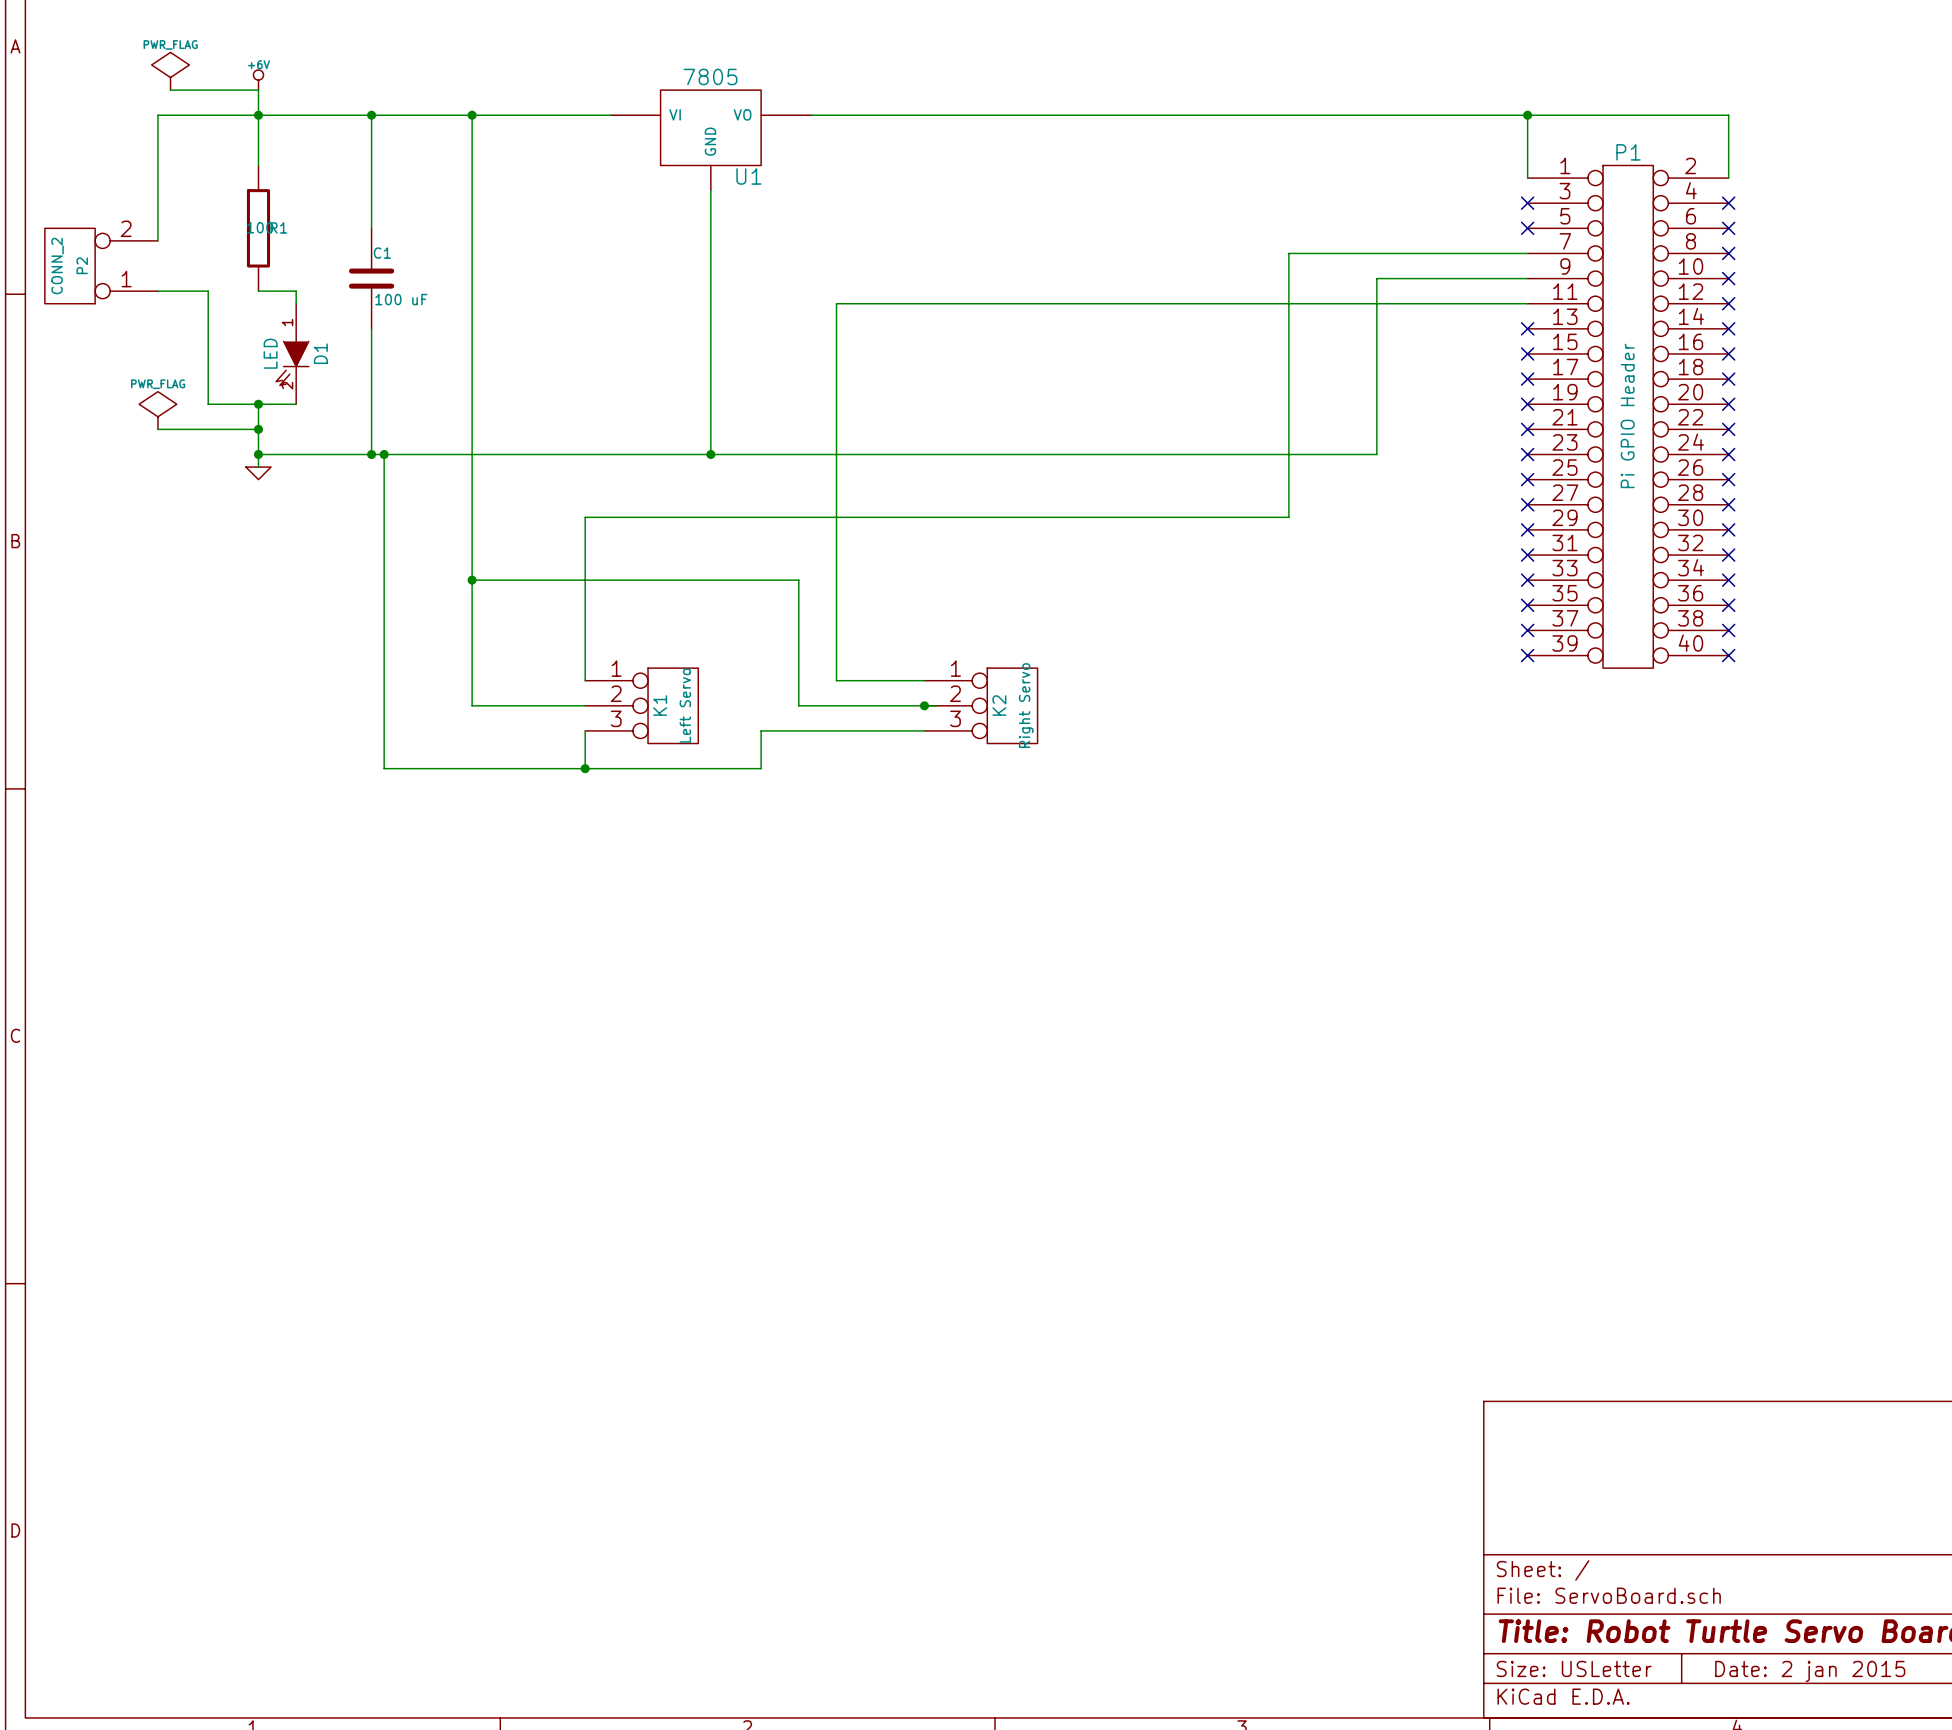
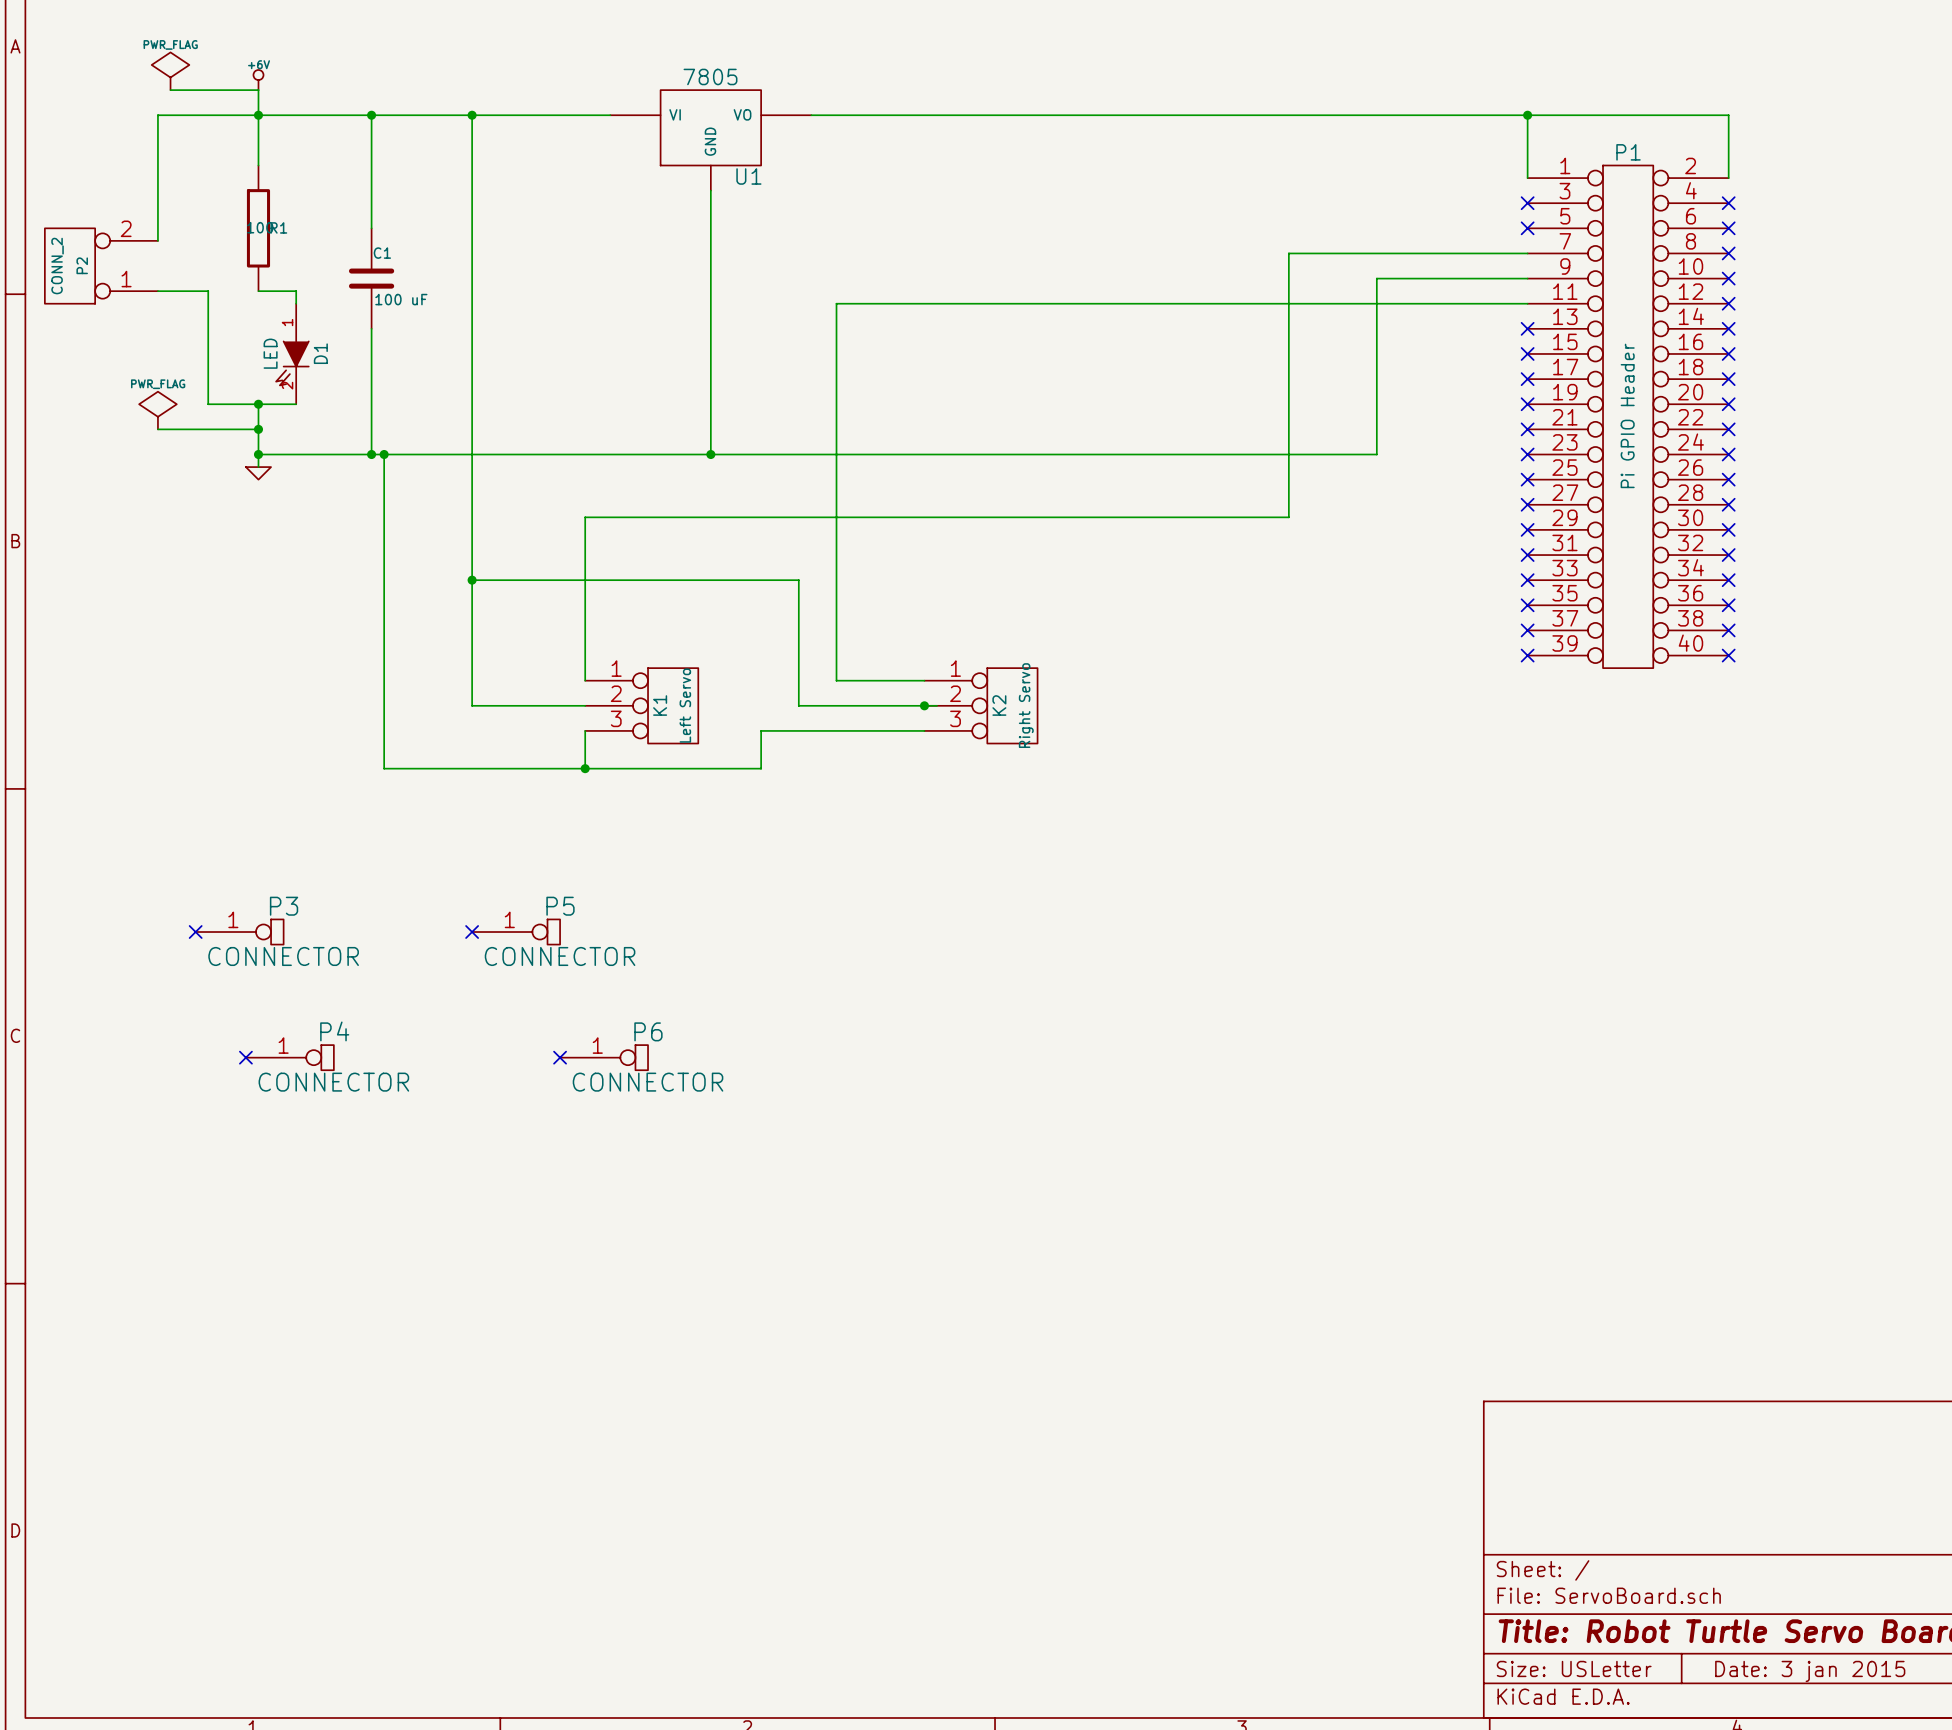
no-connect mark: none -> (195, 932)
P3: none -> CONNECTOR (239, 932)
no-connect mark: none -> (472, 932)
P5: none -> CONNECTOR (516, 932)
no-connect mark: none -> (245, 1057)
P4: none -> CONNECTOR (289, 1057)
no-connect mark: none -> (560, 1057)
P6: none -> CONNECTOR (604, 1057)
title block: Date: 2 jan 2015 (1810, 1671) -> Date: 3 jan 2015 (1810, 1671)

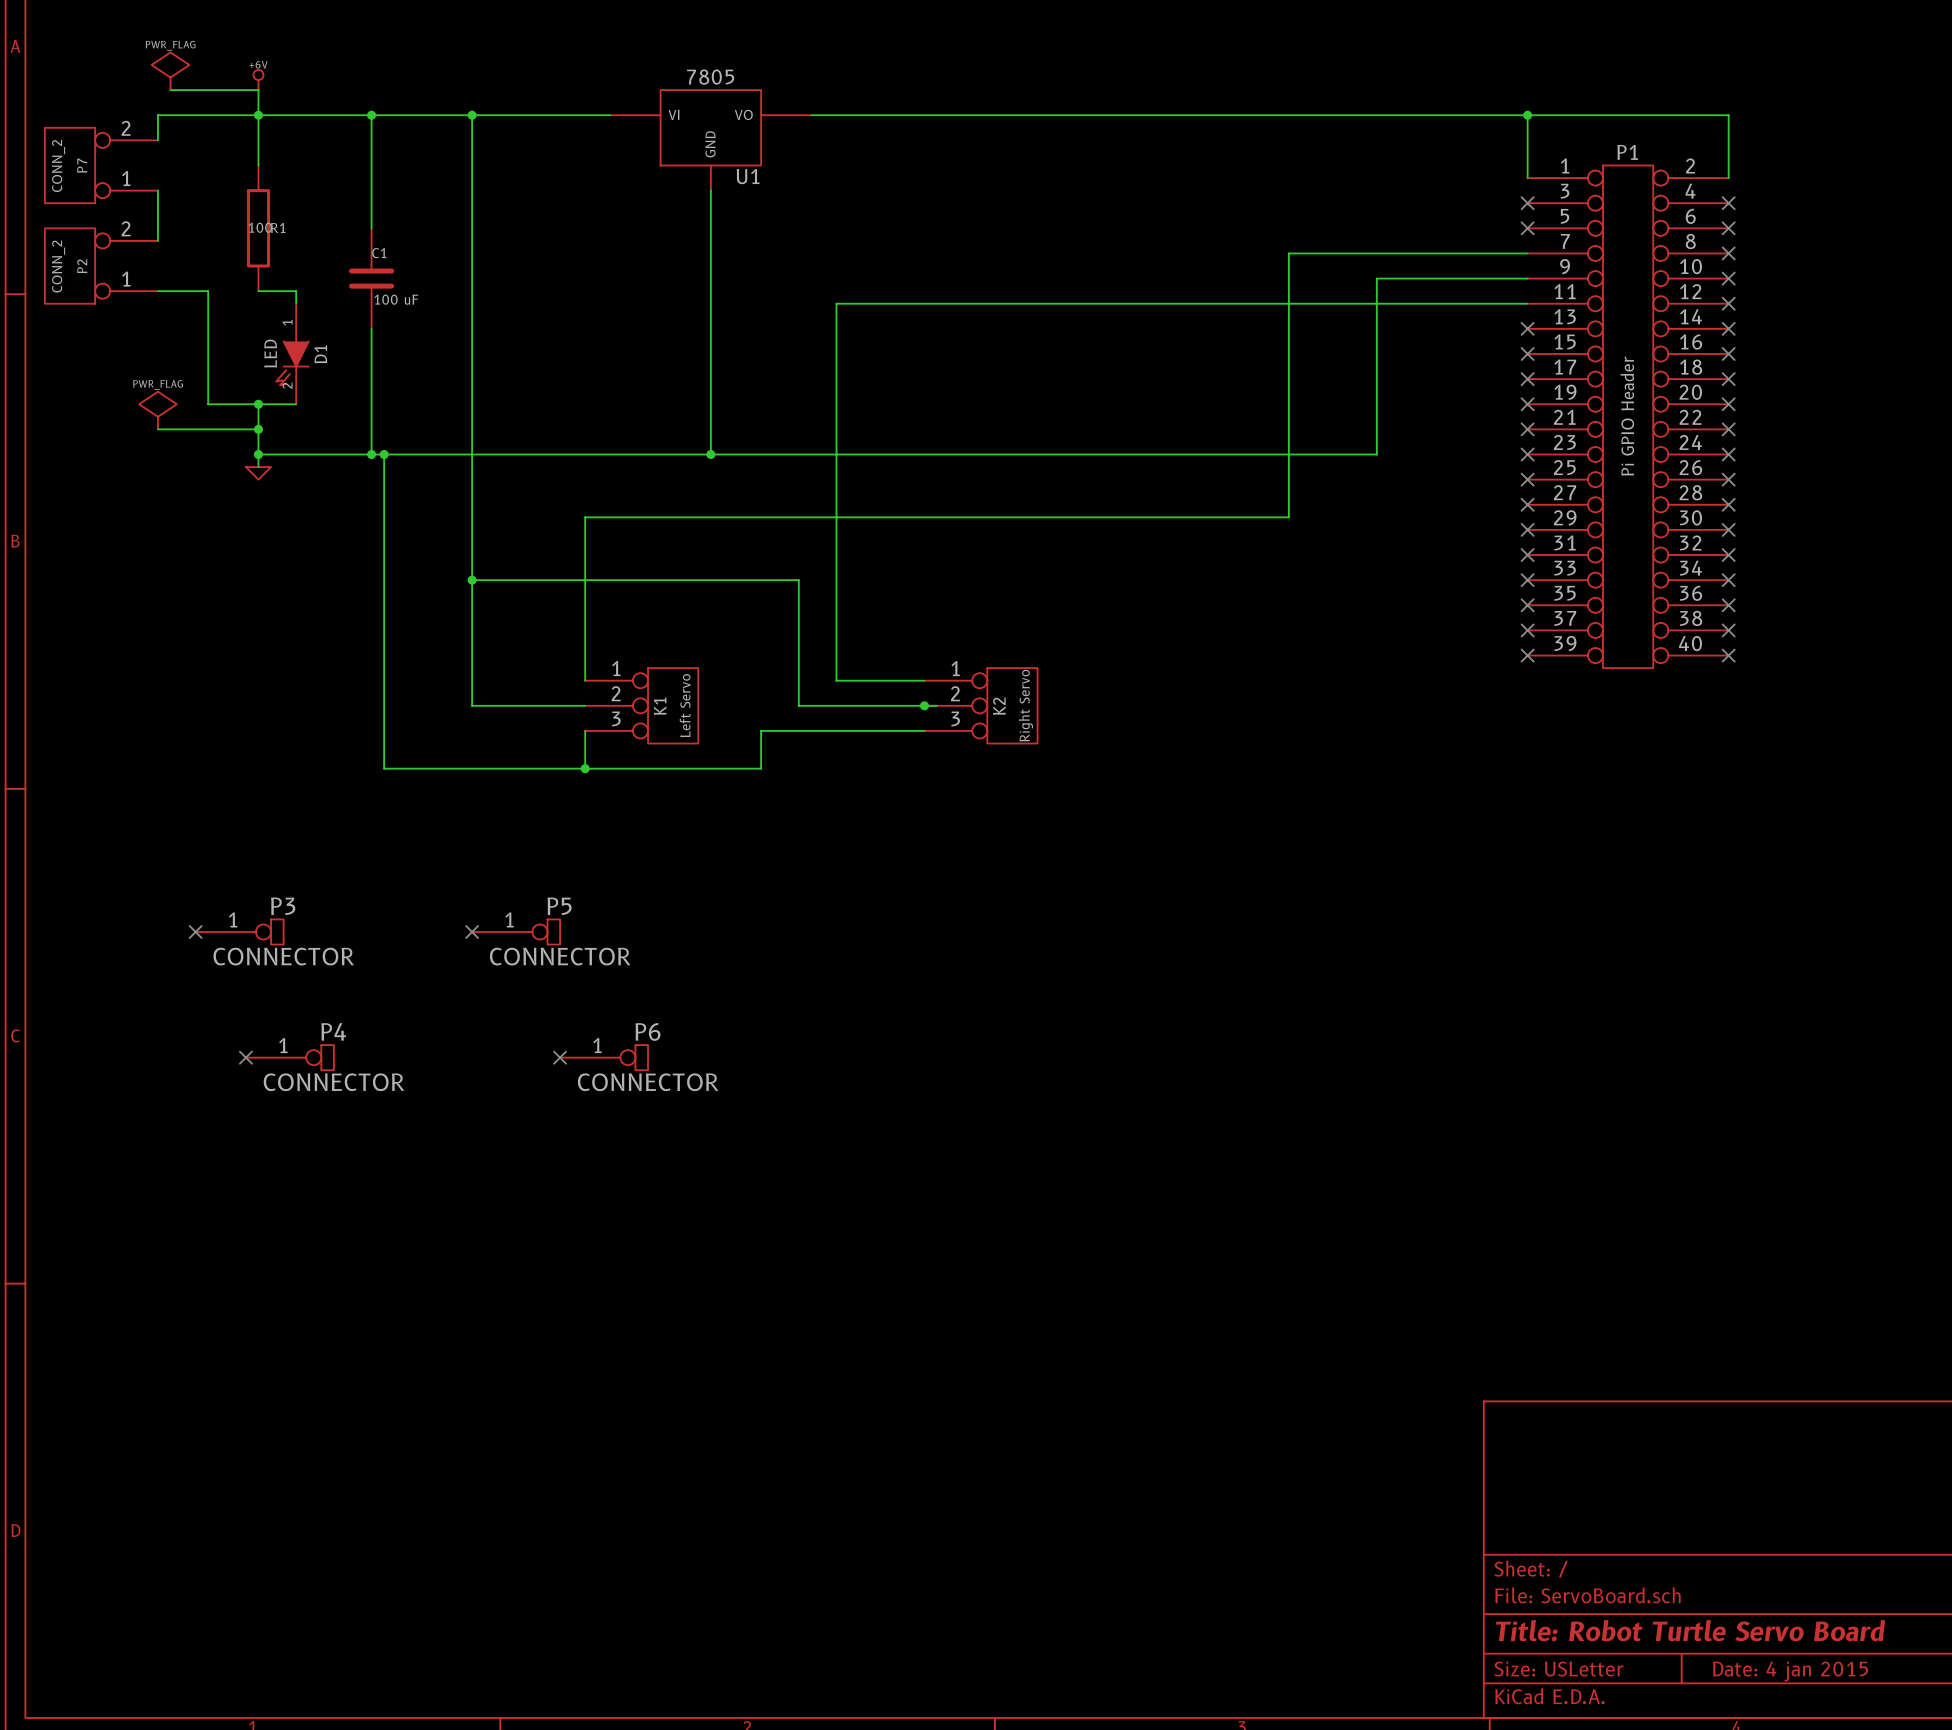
wire: (157, 140) (157, 190) -> none
P7: none -> CONN_2 (101, 165)
title block: Date: 3 jan 2015 (1810, 1671) -> Date: 4 jan 2015 (1790, 1671)

